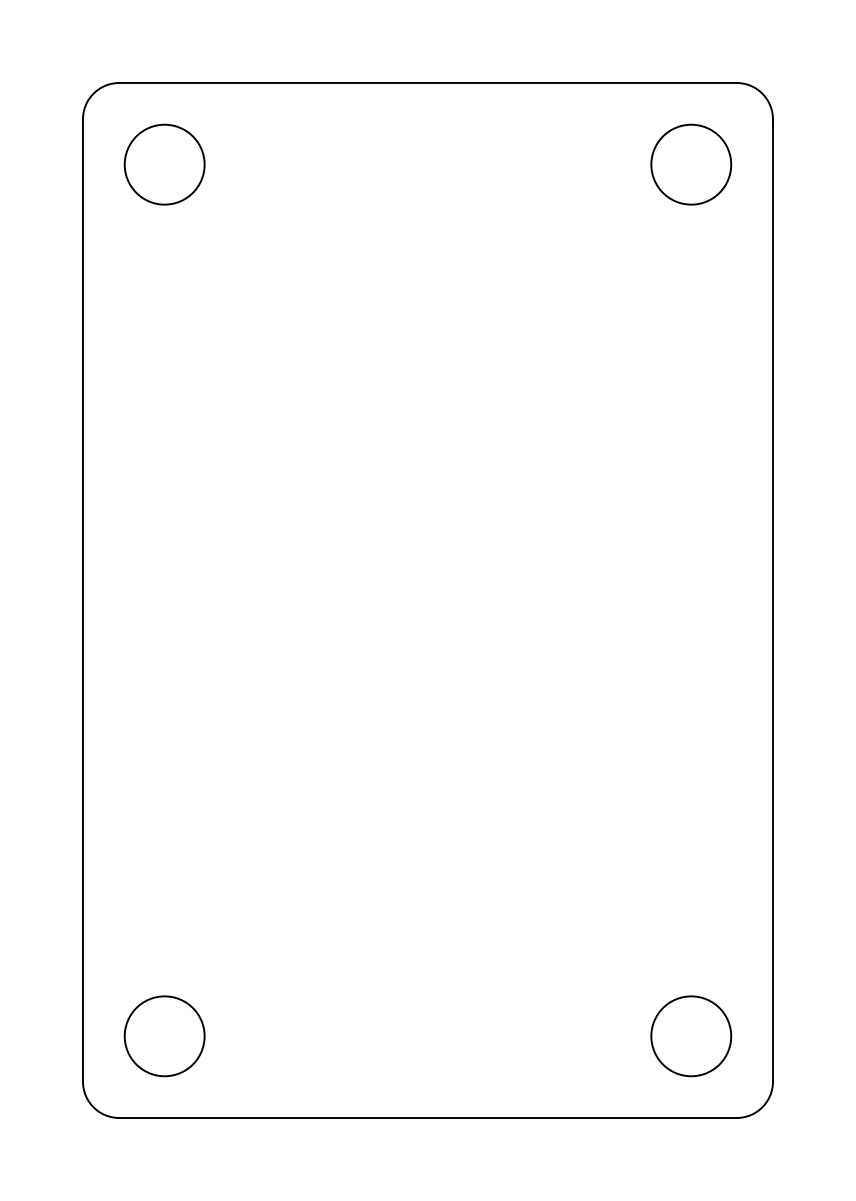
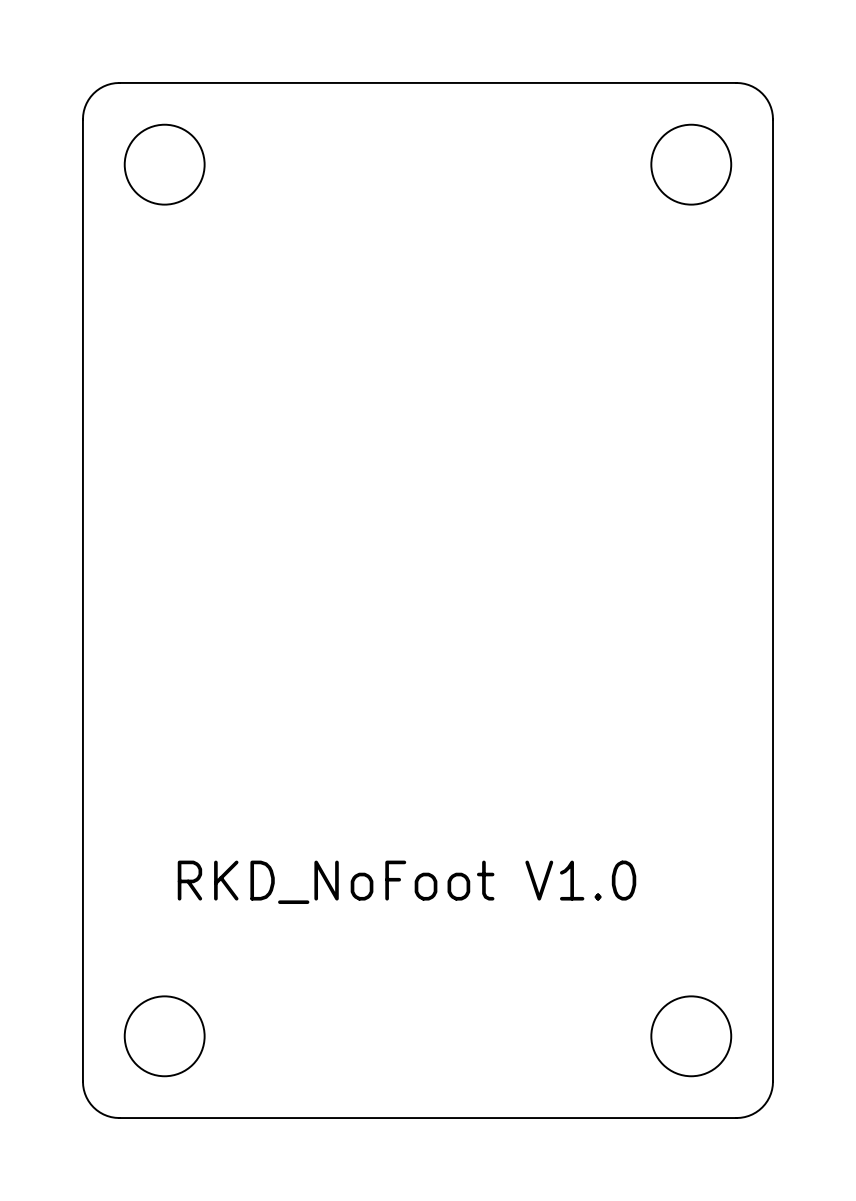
text: none -> RKD_NoFoot V1.0 (407, 882)

